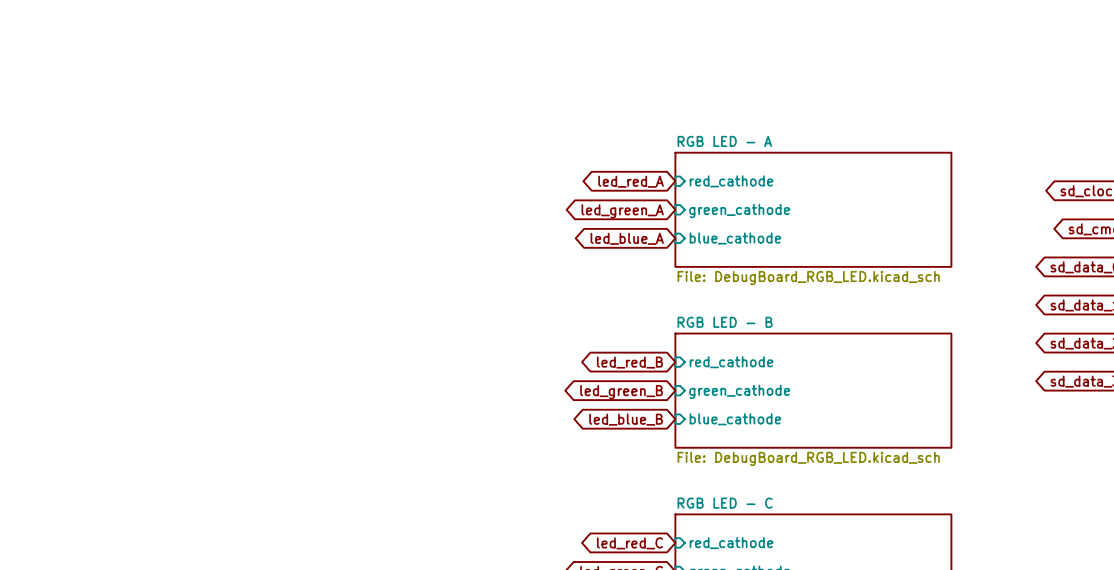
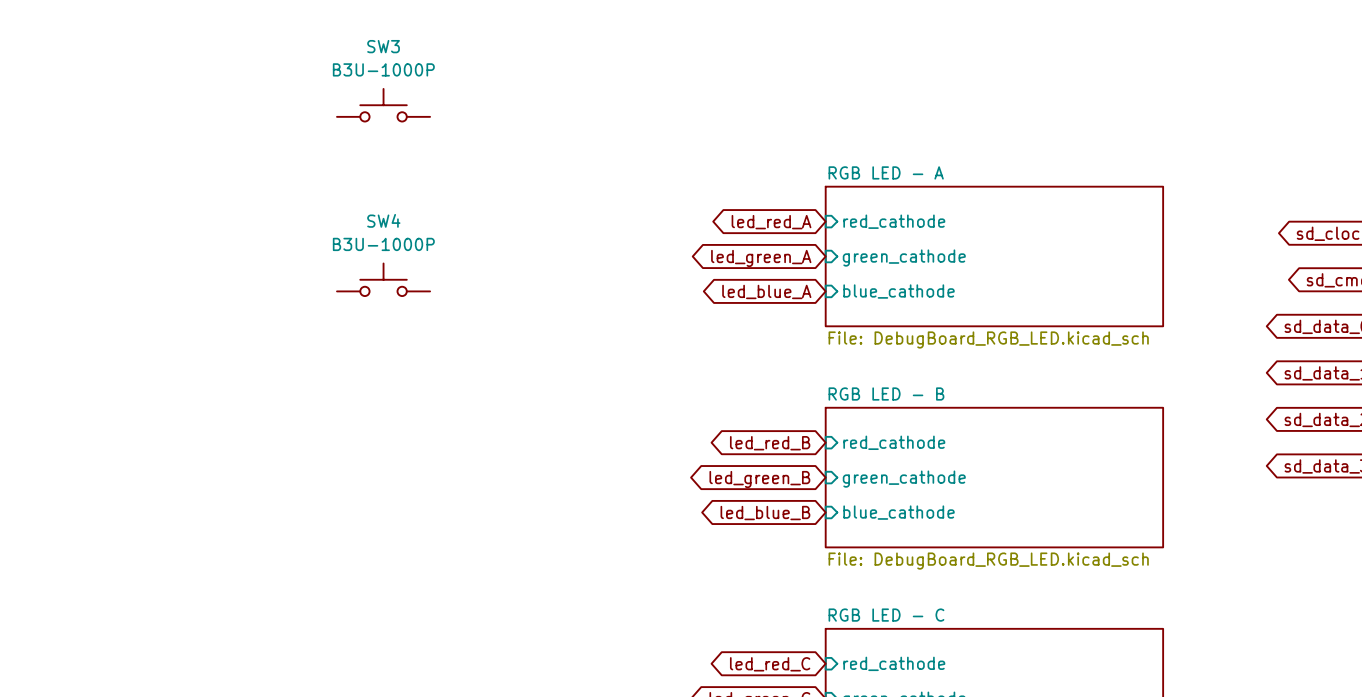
SW3: none -> B3U-1000P (383, 105)
SW4: none -> B3U-1000P (383, 279)

